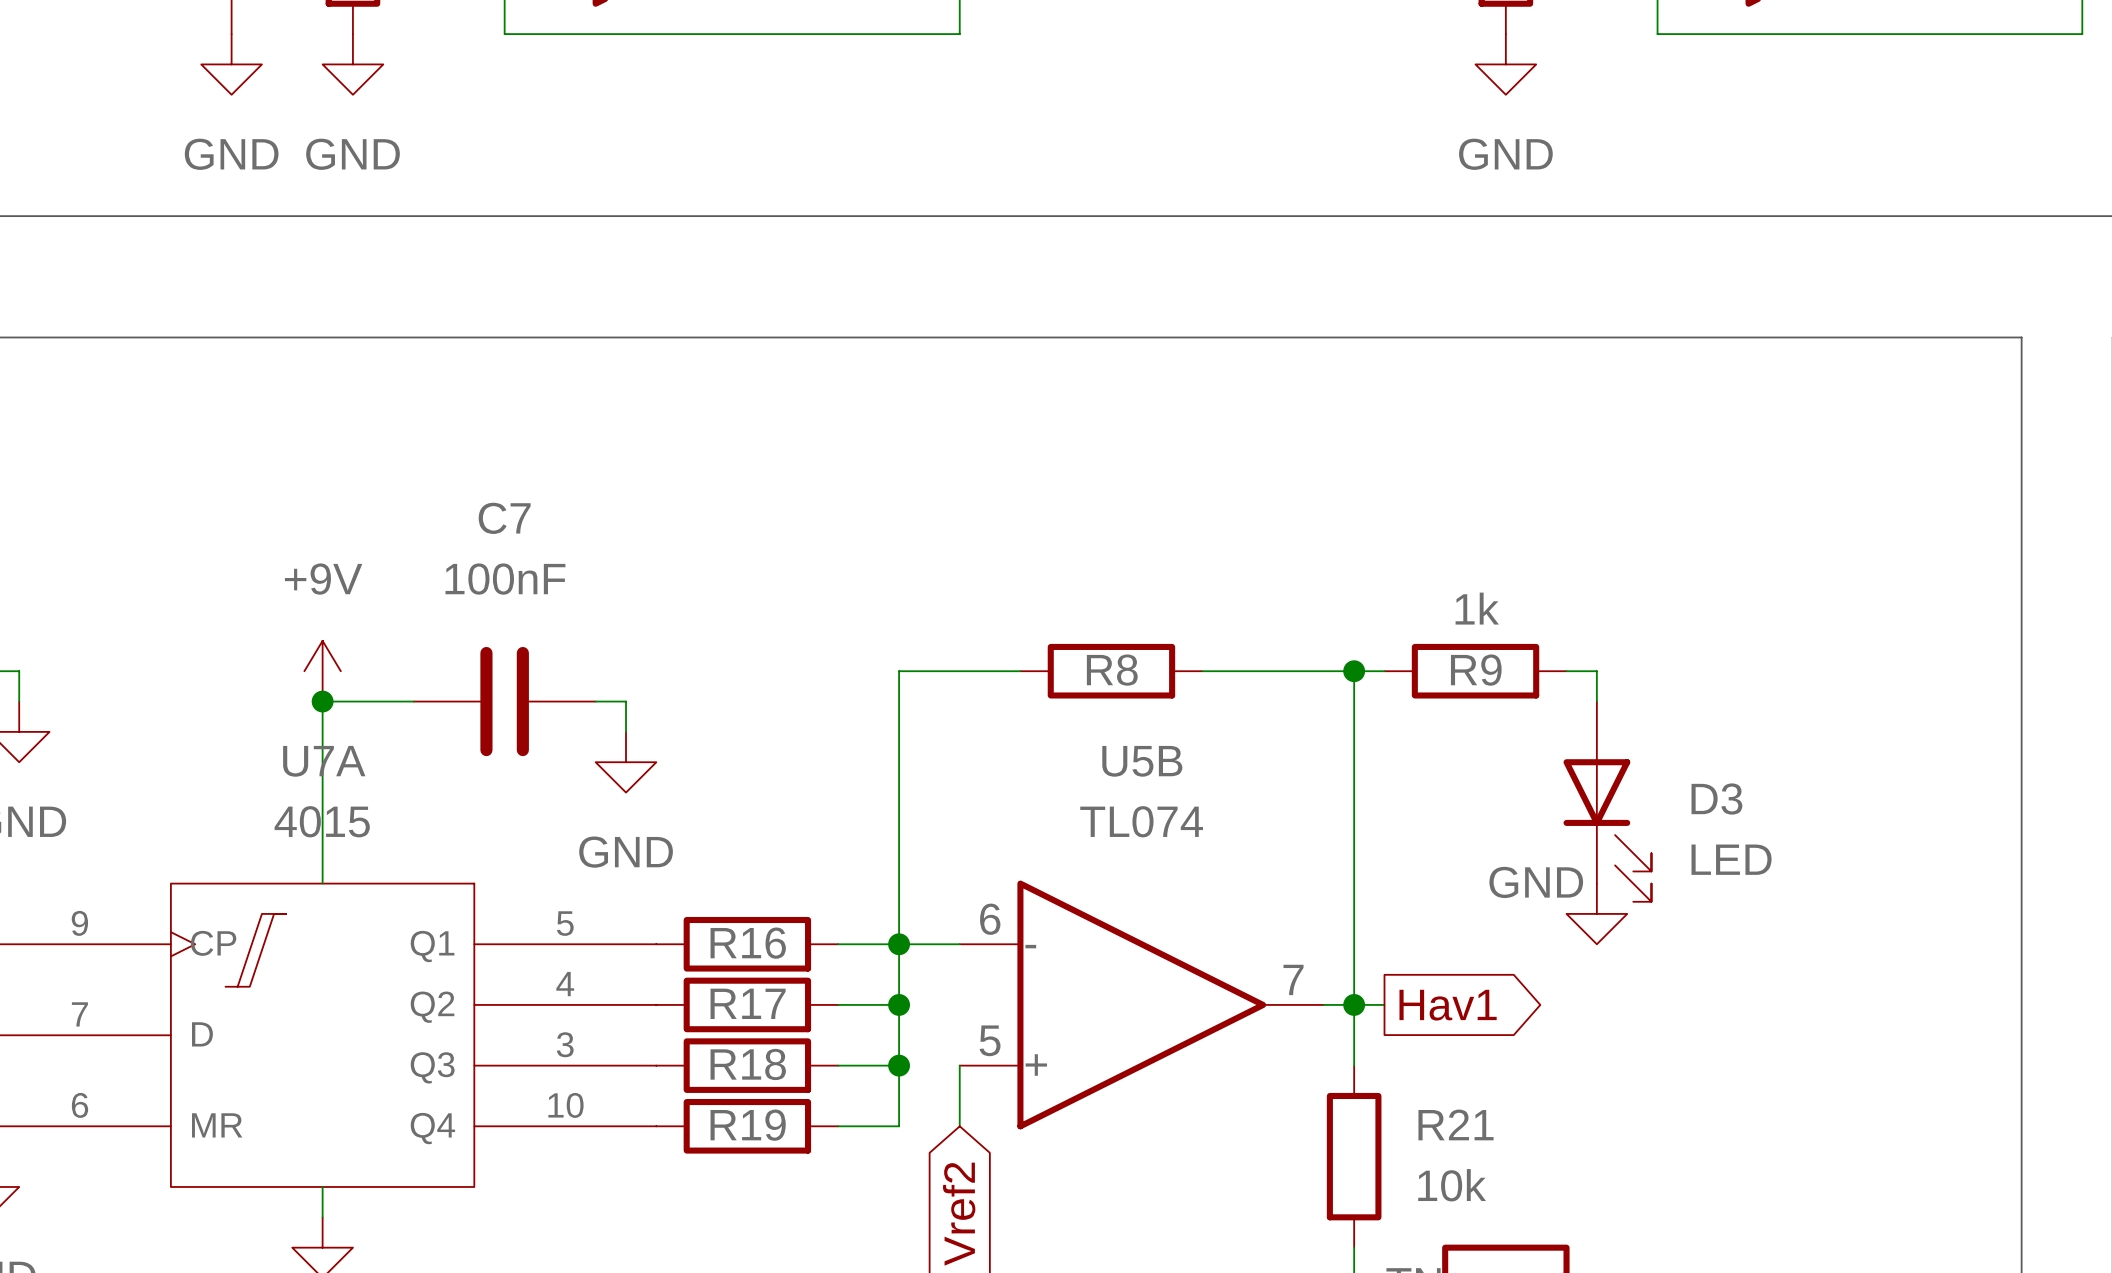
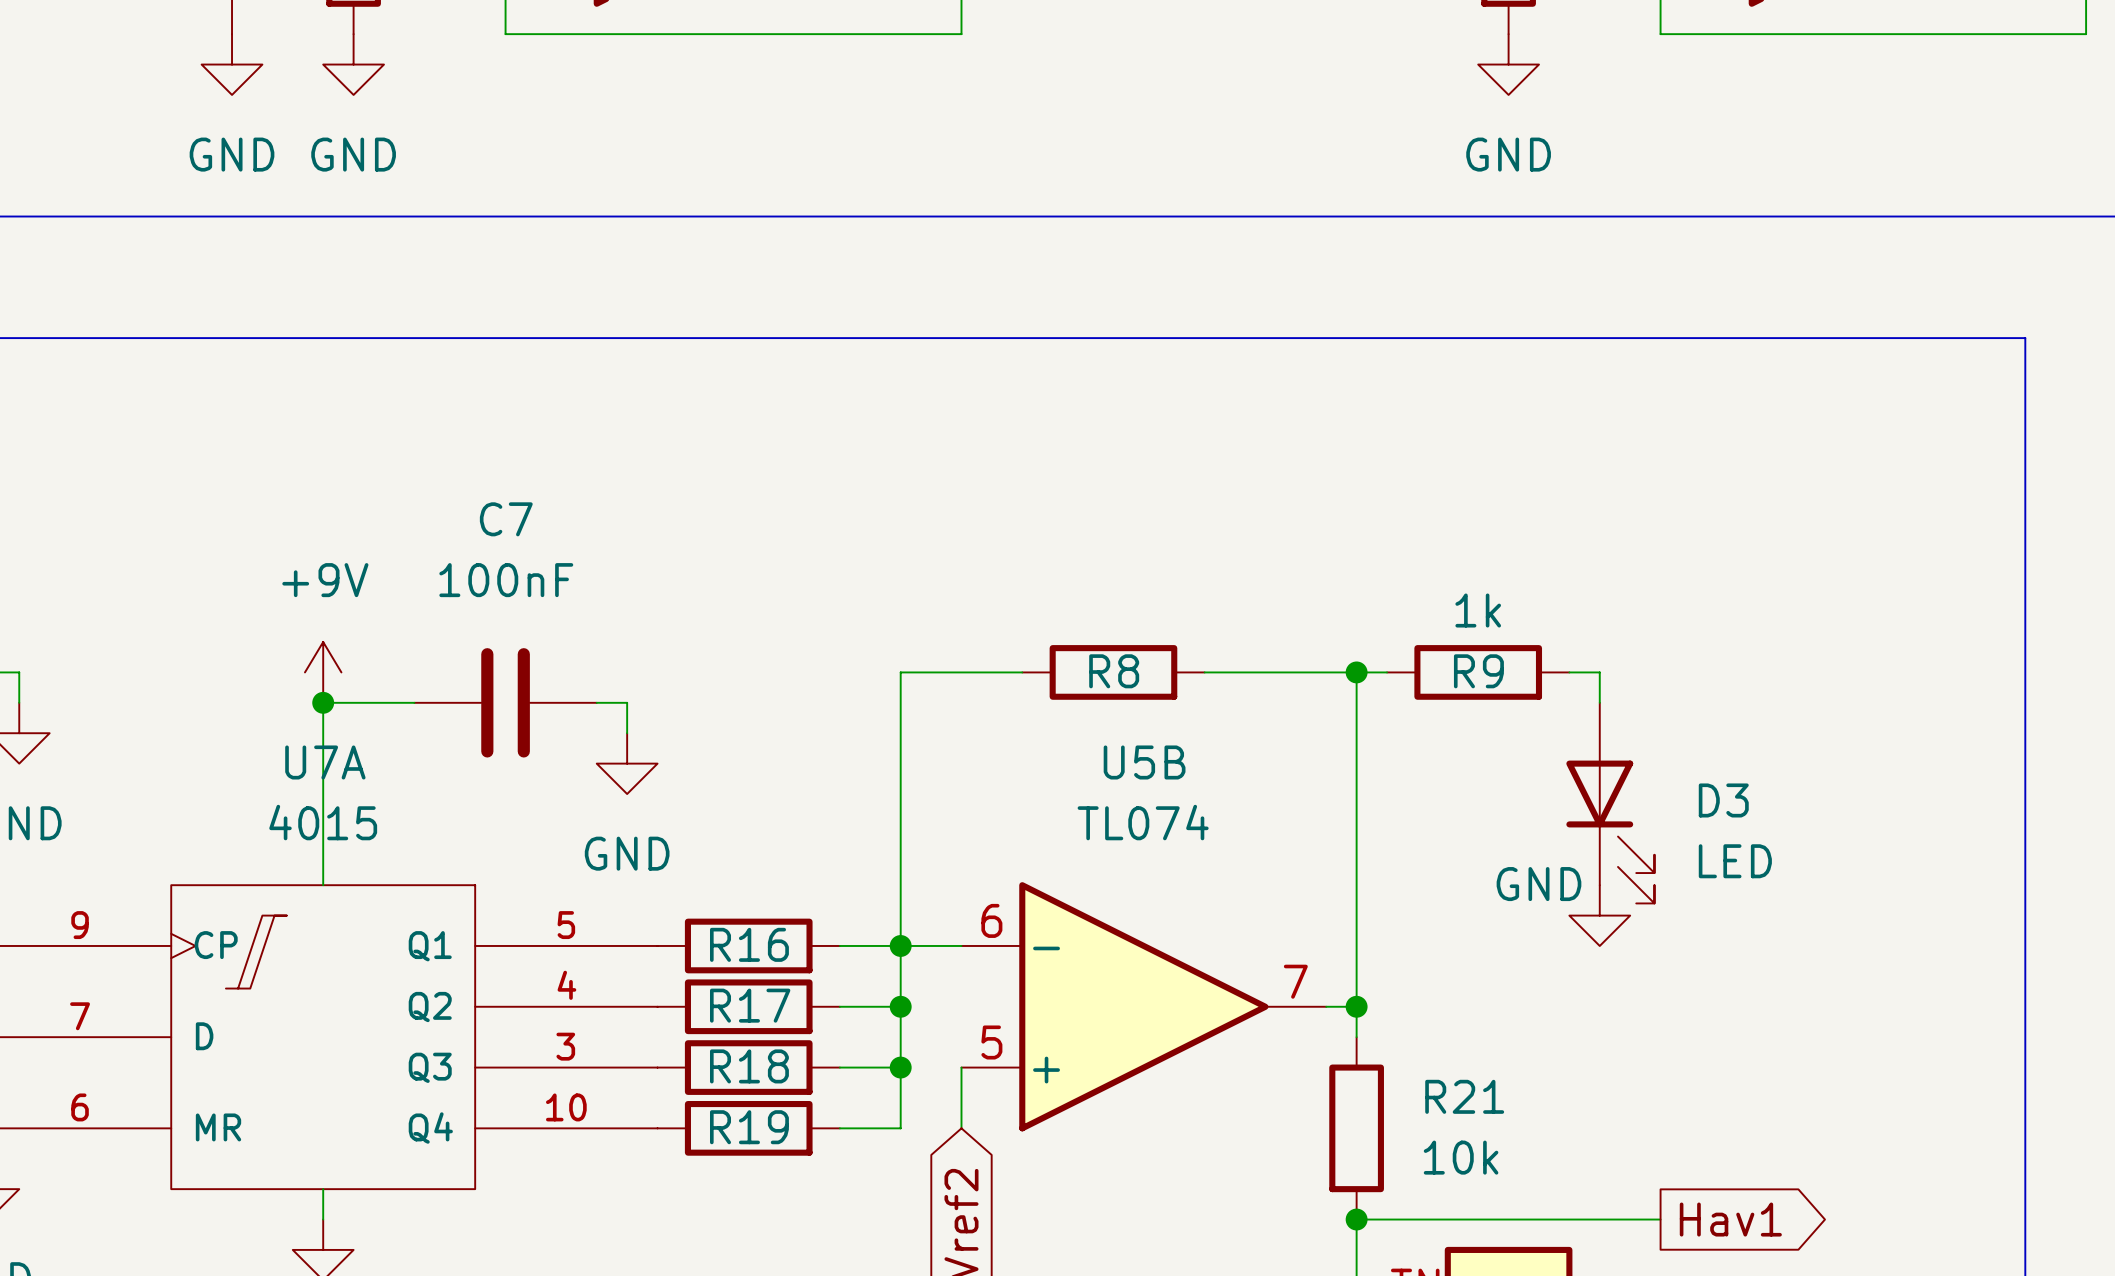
wire: (1354, 1004) (1384, 1004) -> none
global label position: Hav1 (1448, 1005) -> Hav1 (1730, 1219)
R21 position: (1354, 1156) -> (1356, 1128)
junction: none -> (1356, 1219)
wire: none -> (1660, 1219) (1356, 1219) (1356, 1249)

